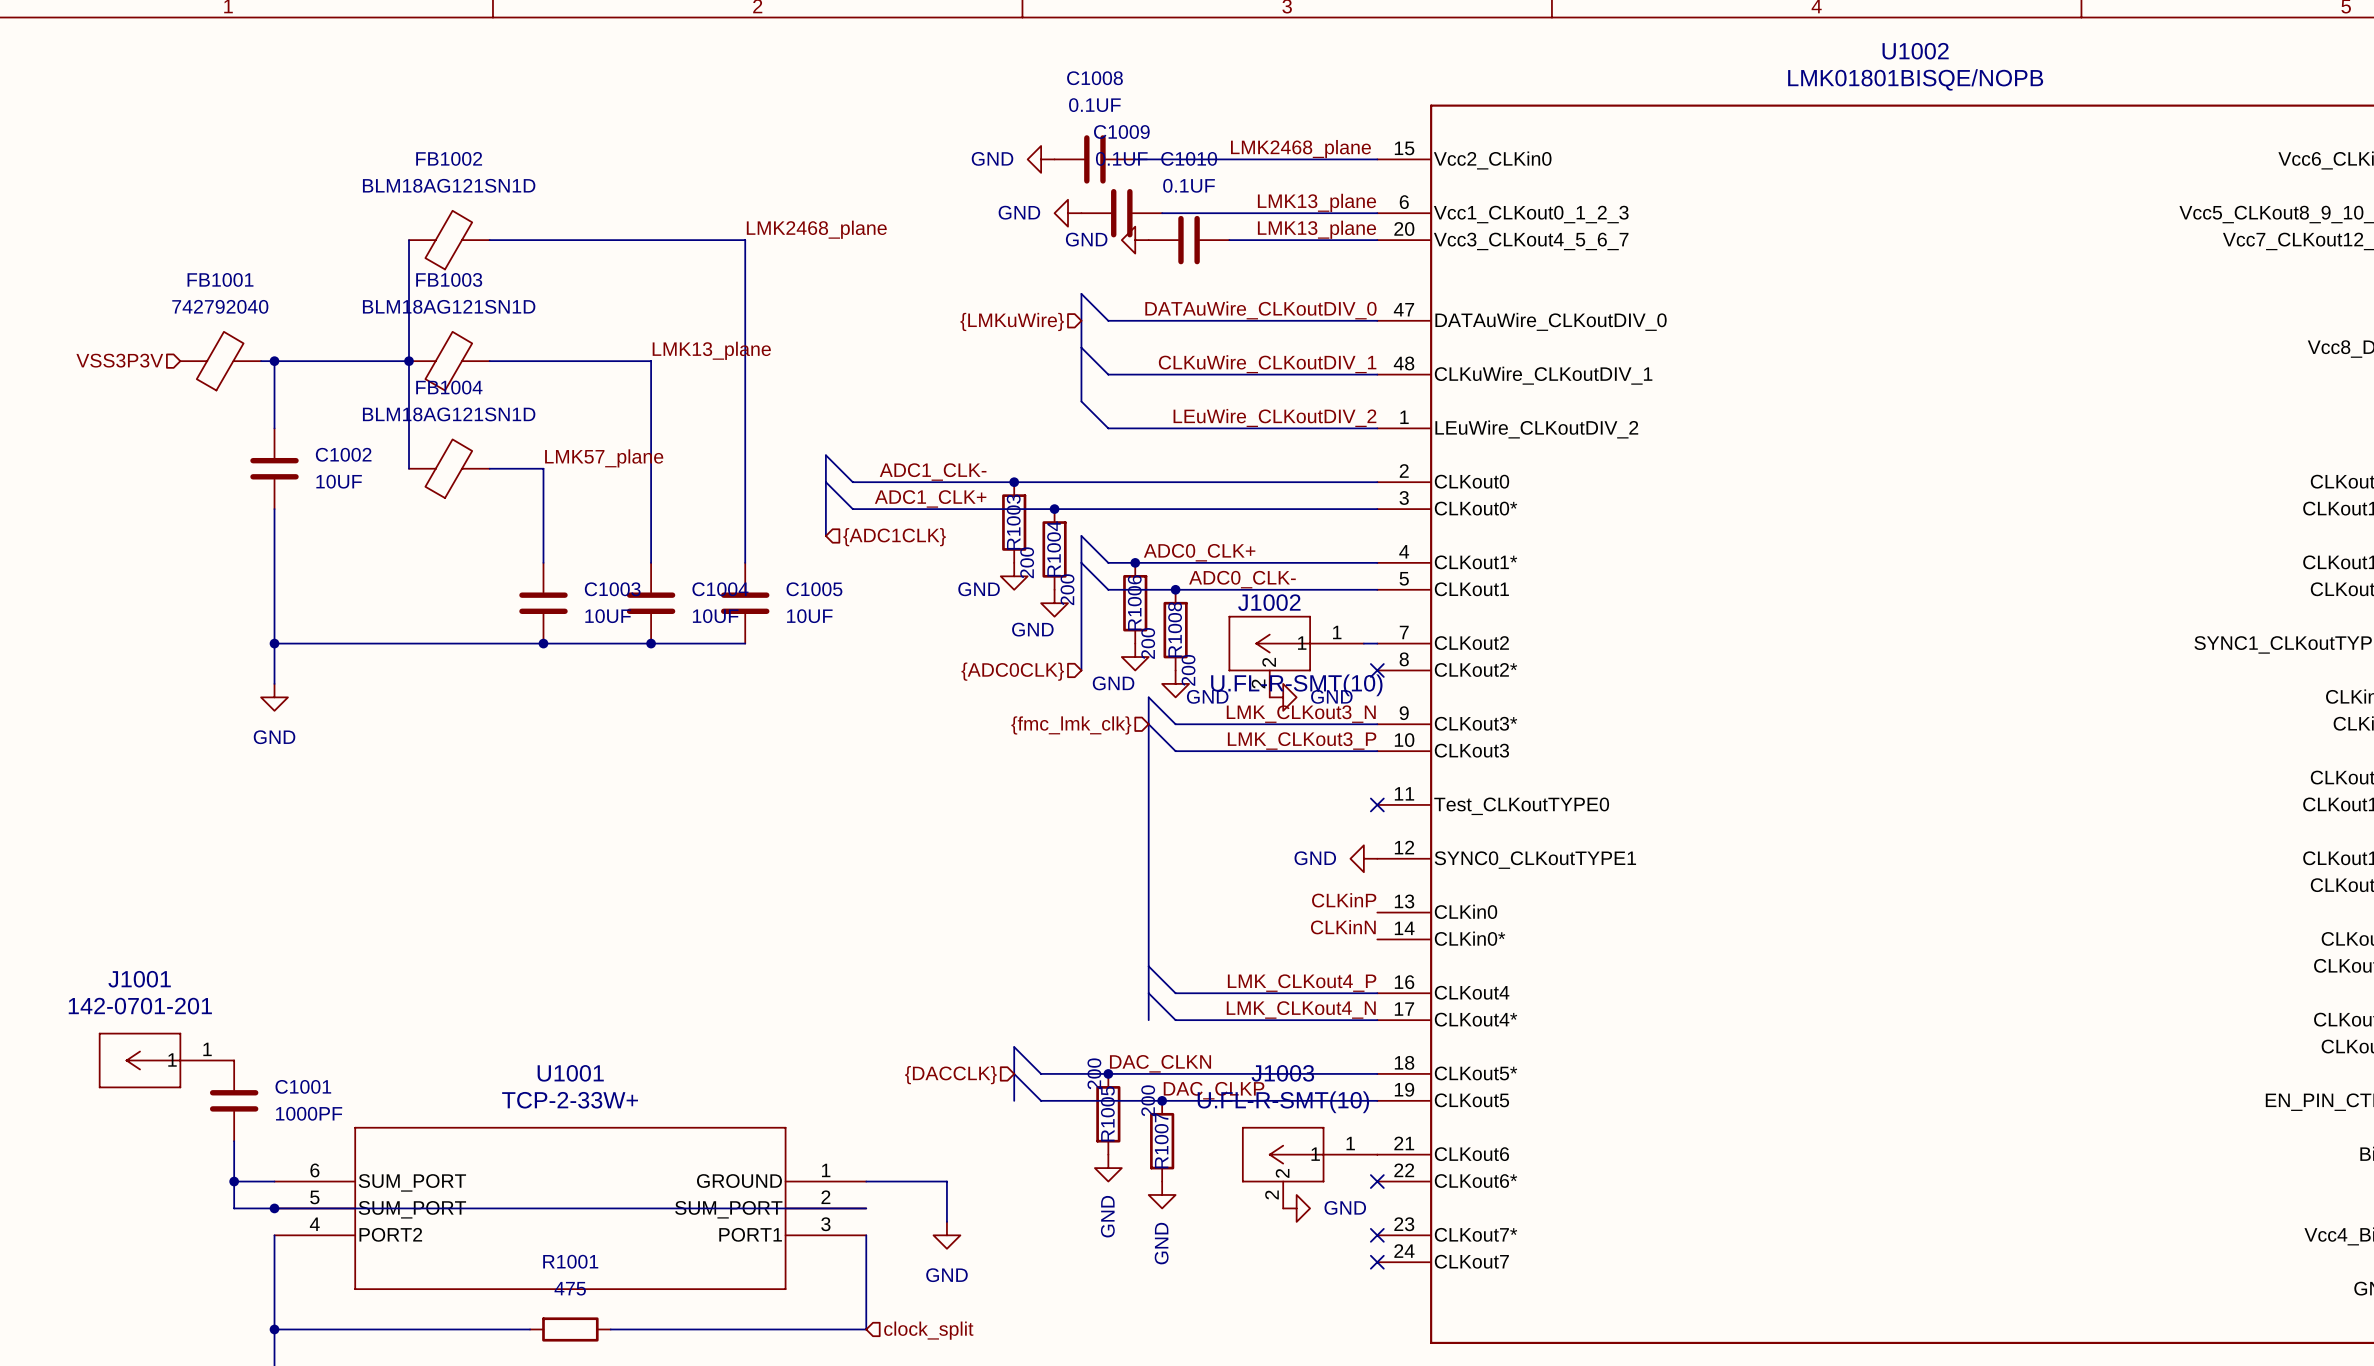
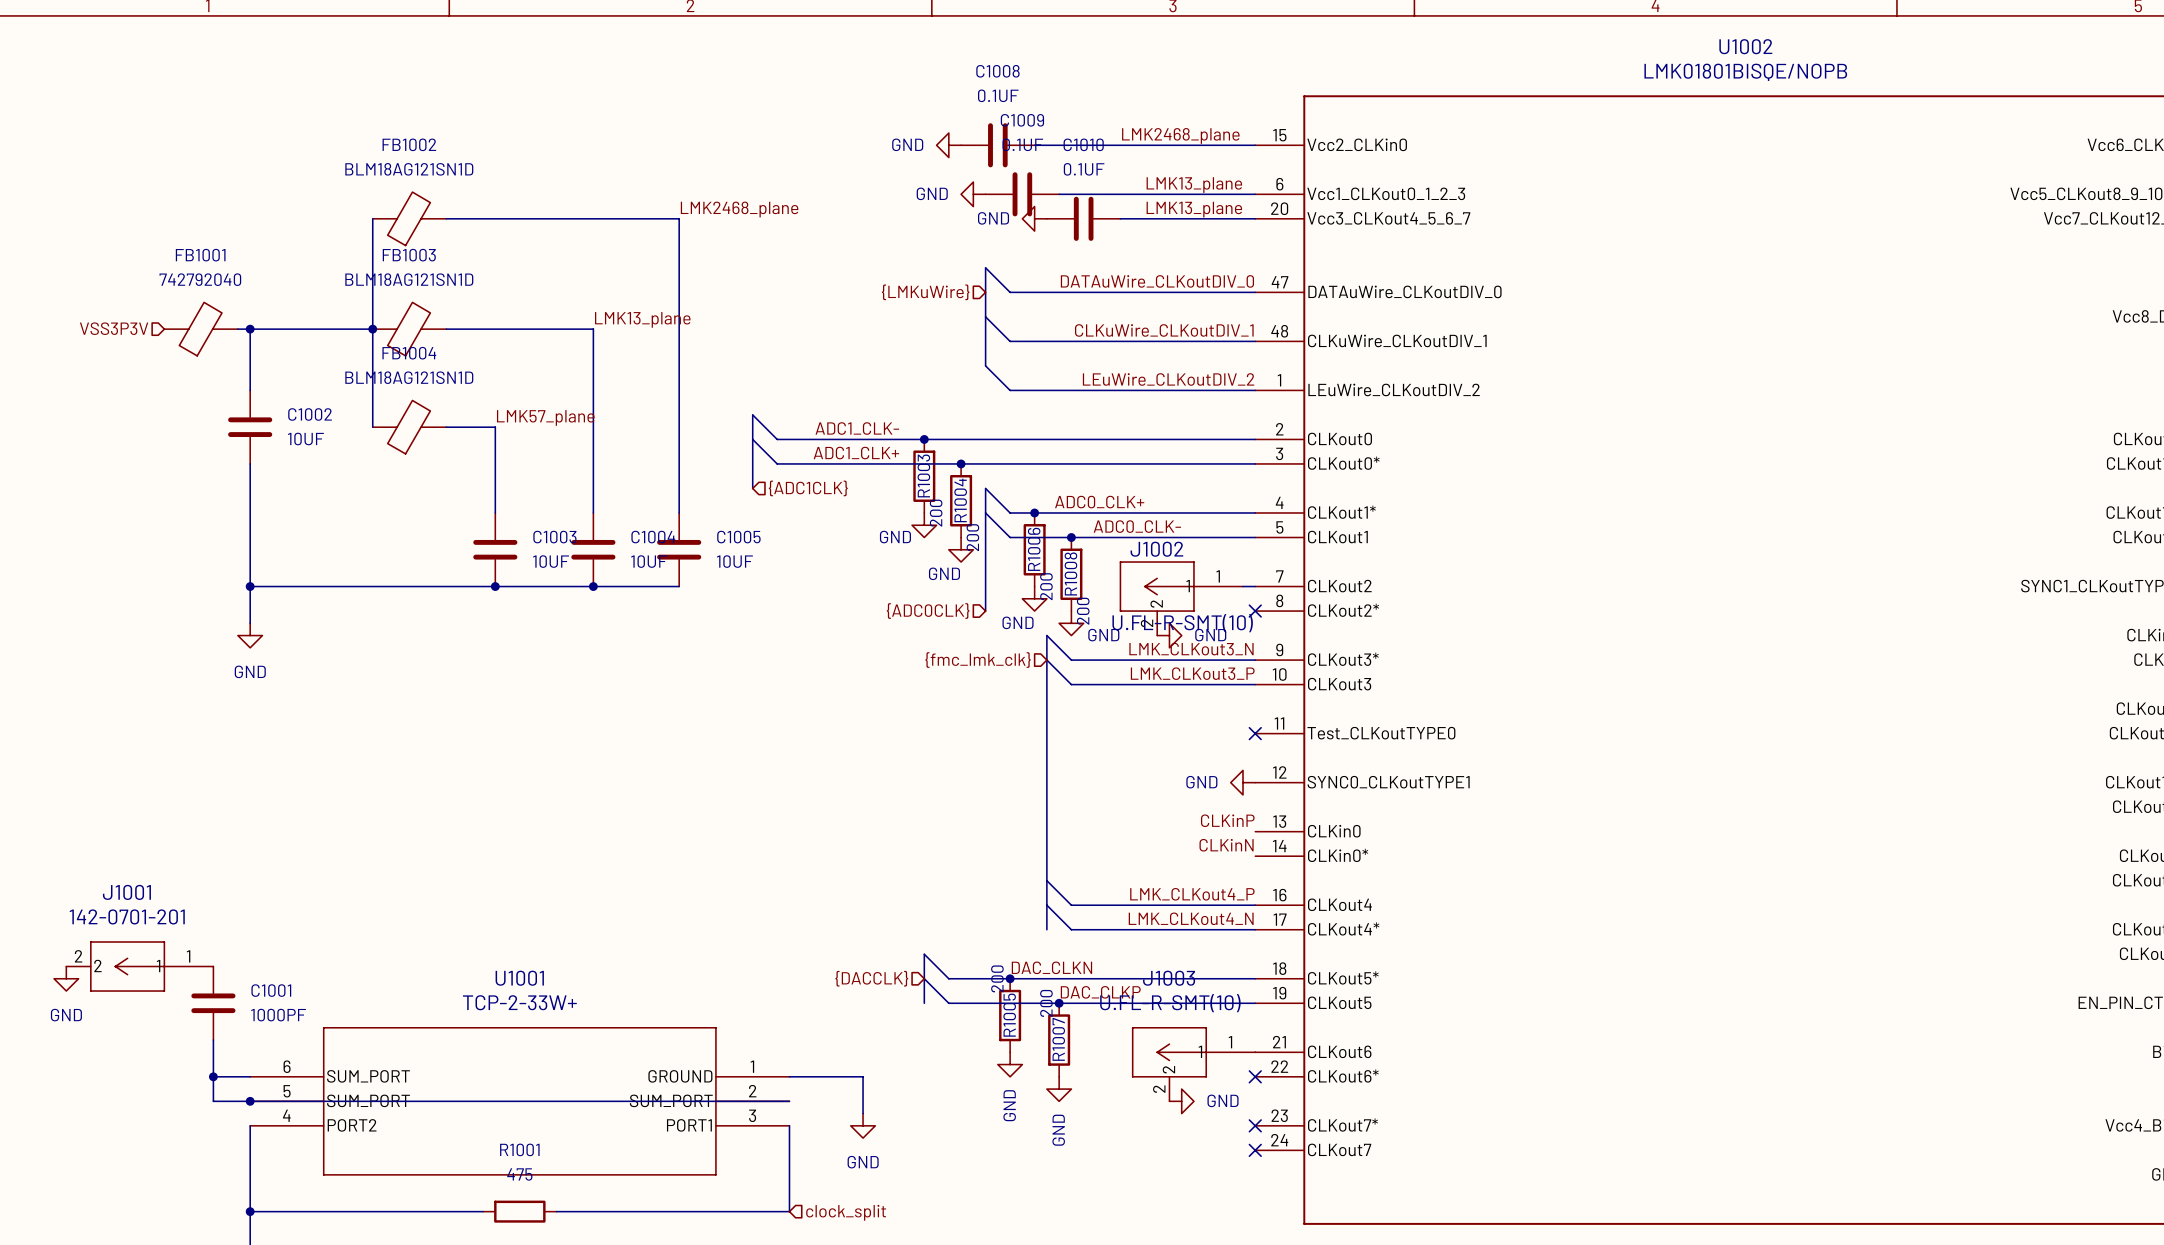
J1001 symbol: [99, 1032, 235, 1089] -> [66, 941, 214, 992]
power symbol: none -> GND (66, 978)

